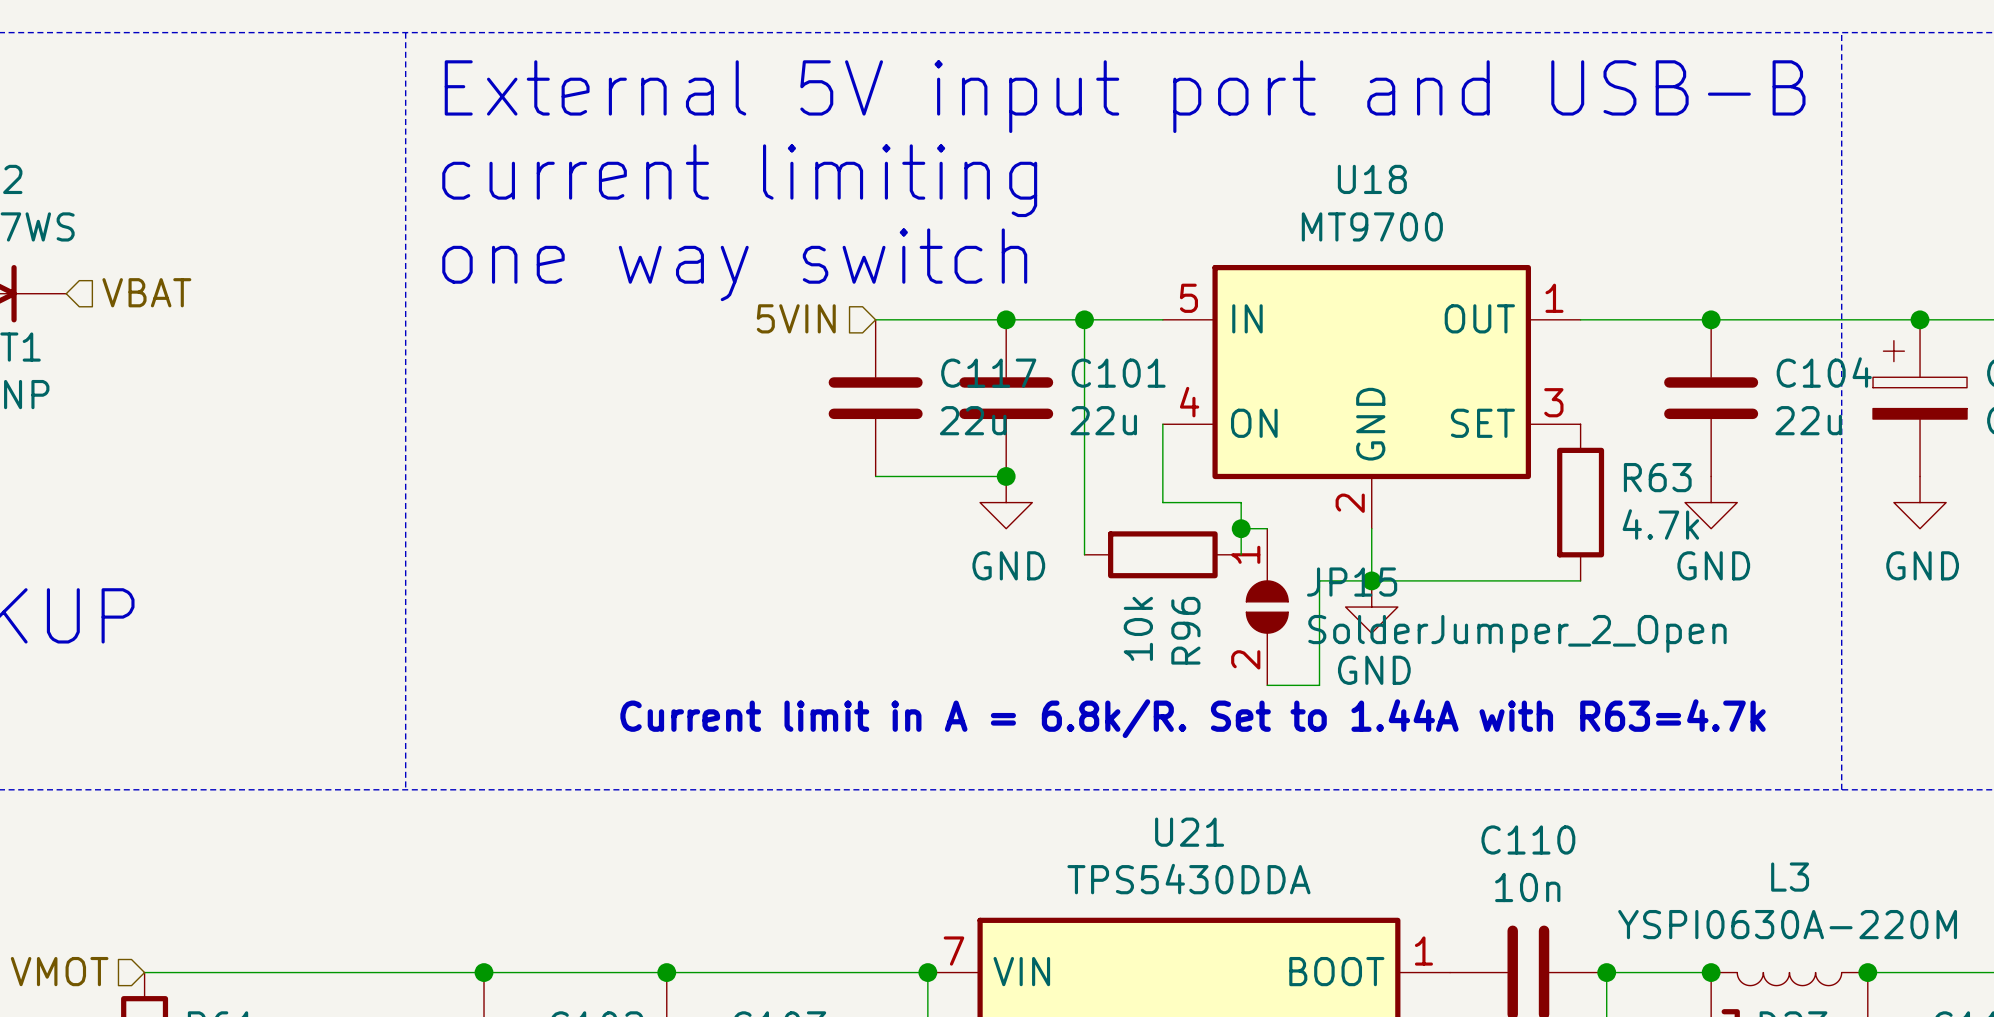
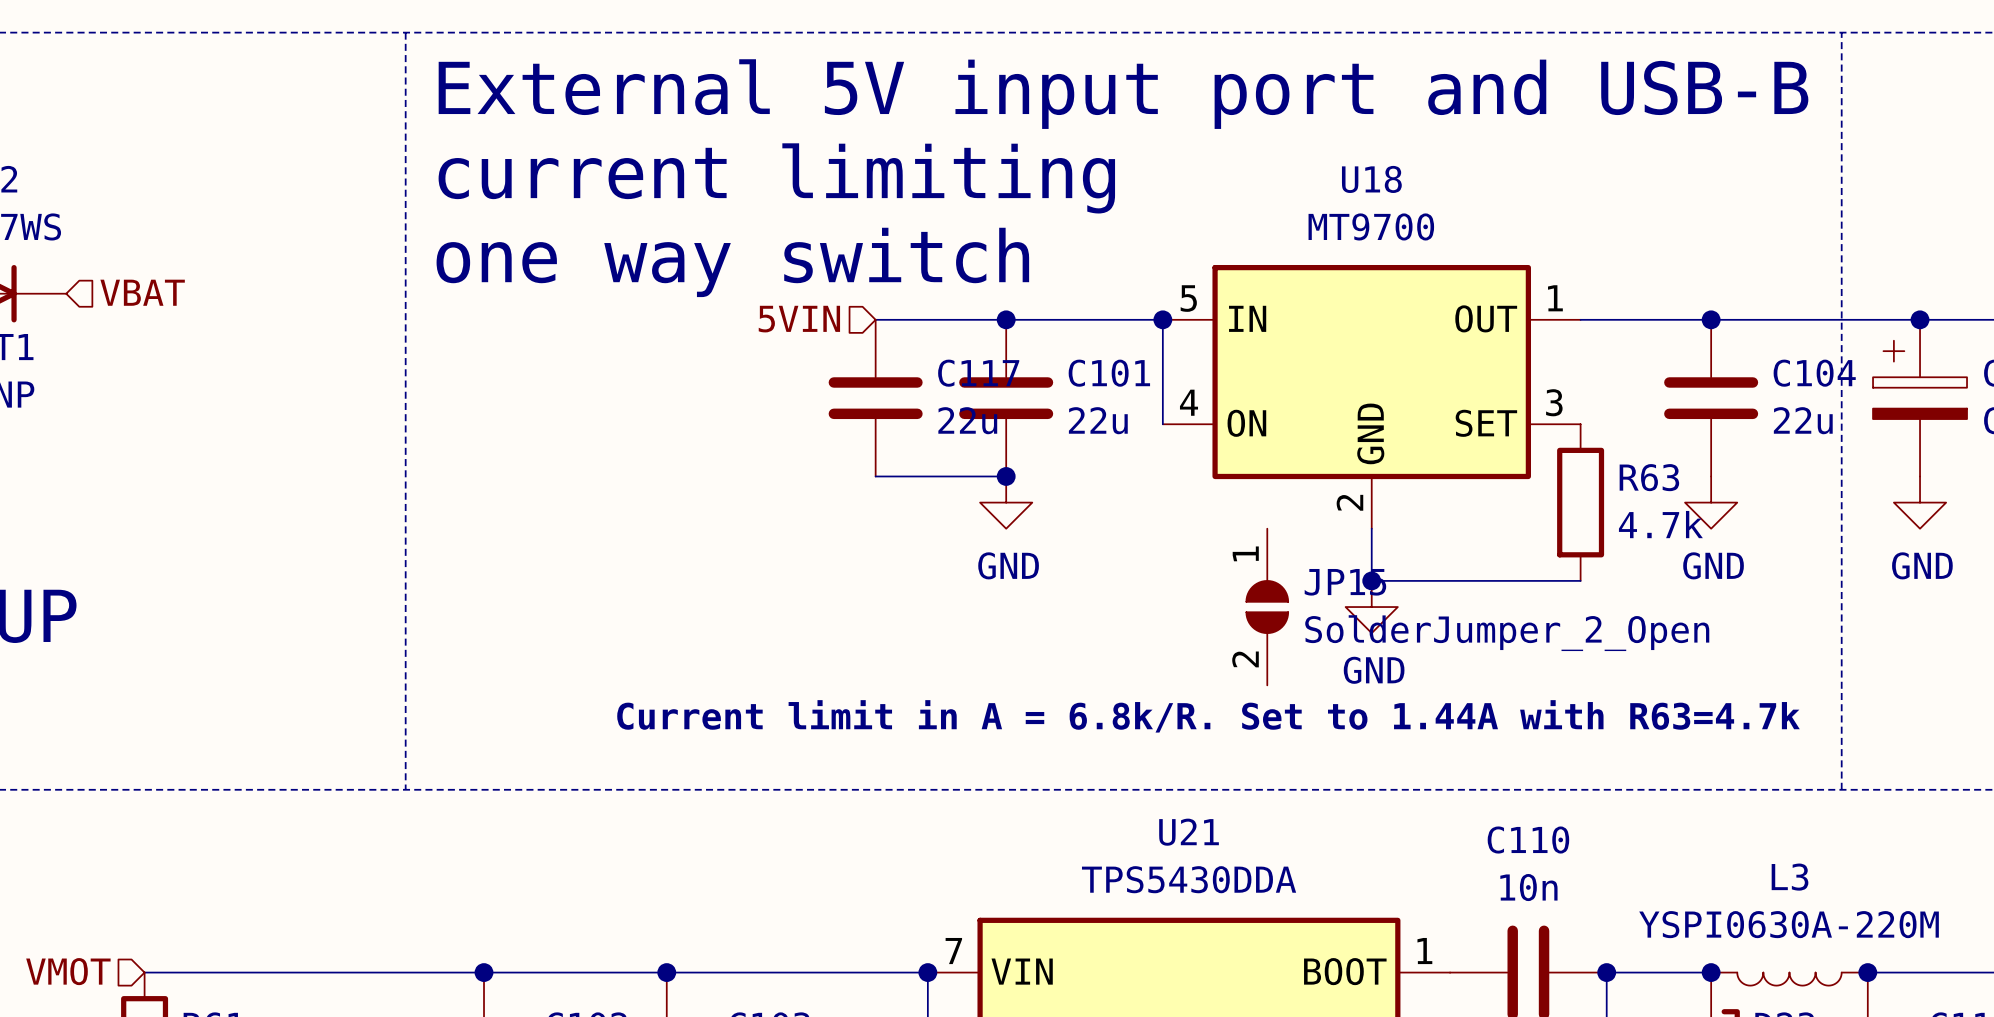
wire: (1084, 319) (1084, 554) -> none
junction position: (1084, 319) -> (1162, 319)
wire: (1162, 424) (1162, 502) (1241, 502) (1241, 554) -> (1162, 424) (1162, 319)
wire: (1241, 528) (1267, 528) -> none
junction: (1241, 528) -> none
R96: 10k (1162, 554) -> none
wire: (1371, 580) (1319, 580) (1319, 685) (1267, 685) -> none

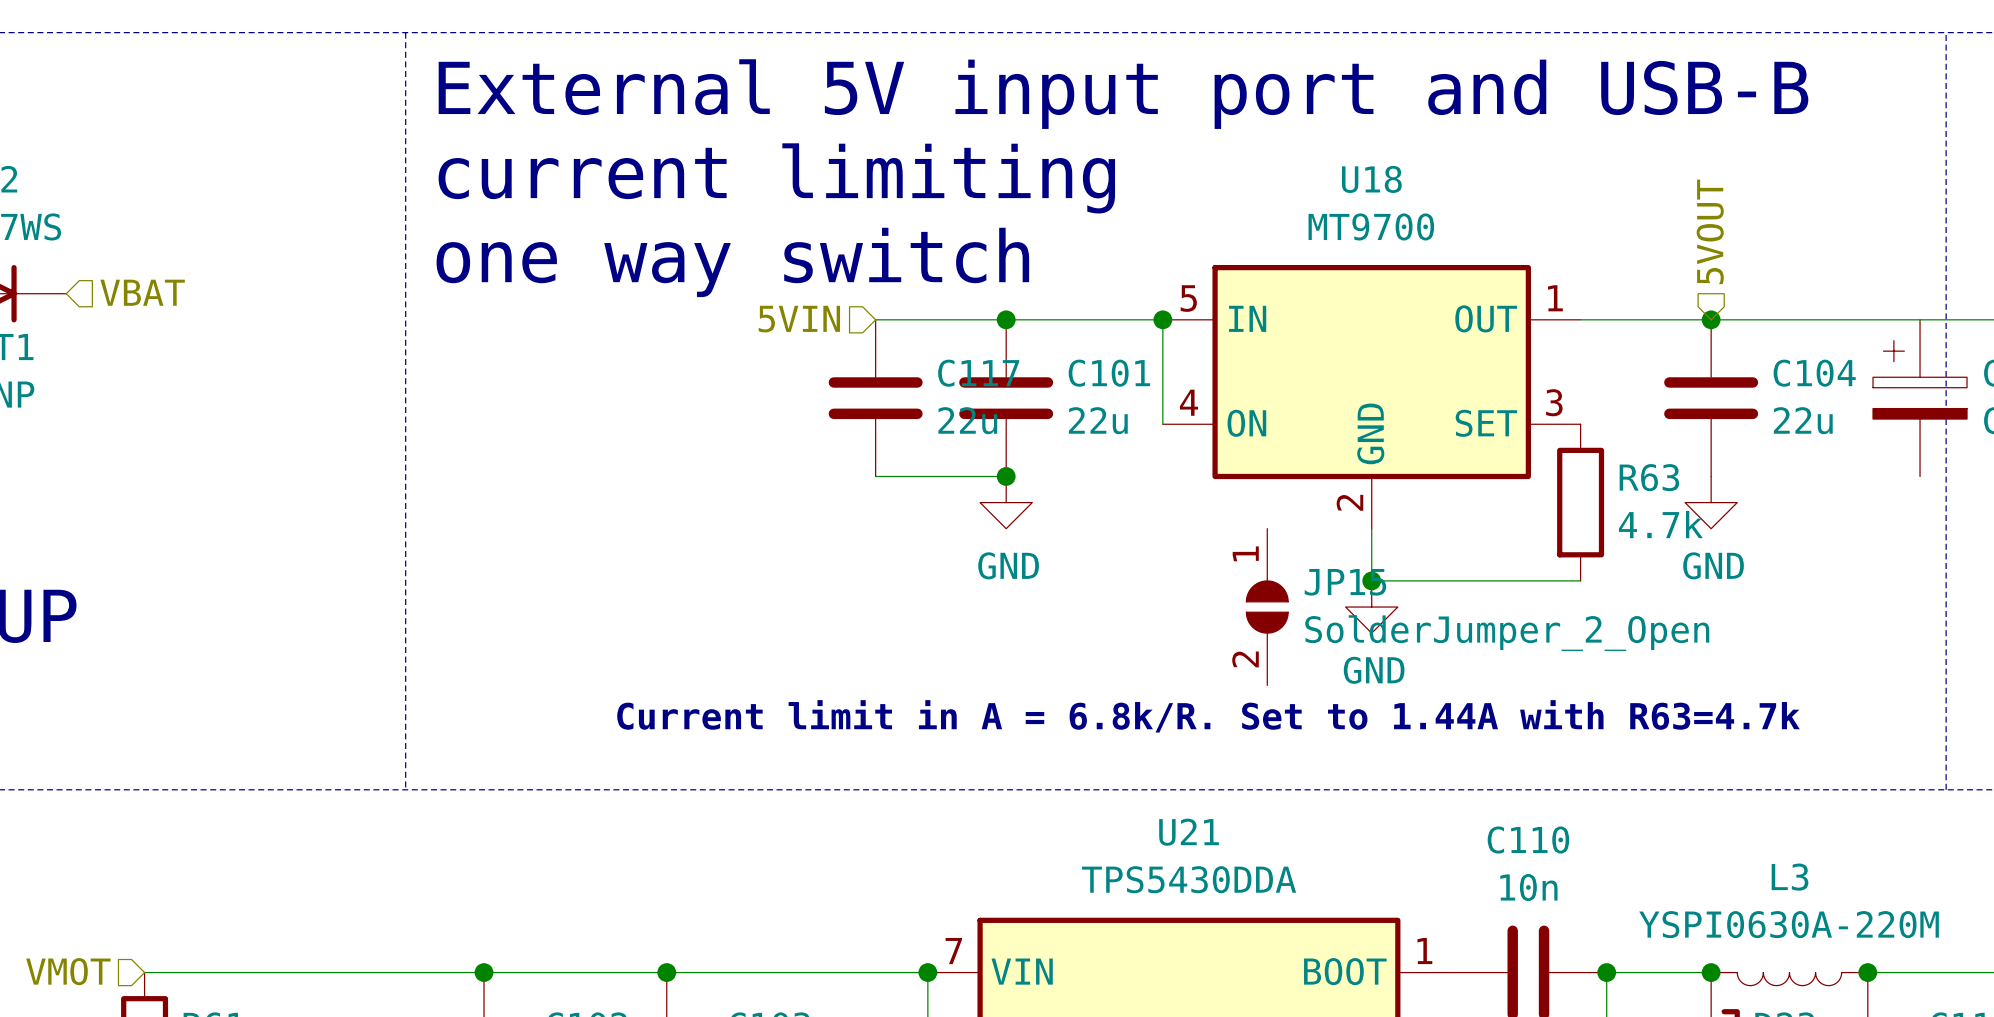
line: (1841, 32) (1841, 789) -> (1946, 32) (1946, 789)
hierarchical label: none -> 5VOUT (1710, 231)
junction: (1920, 319) -> none
power symbol: GND (1920, 502) -> none

